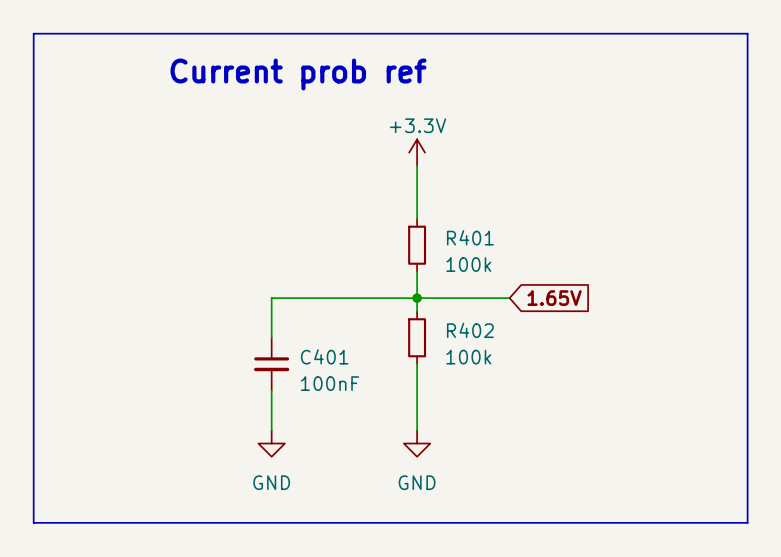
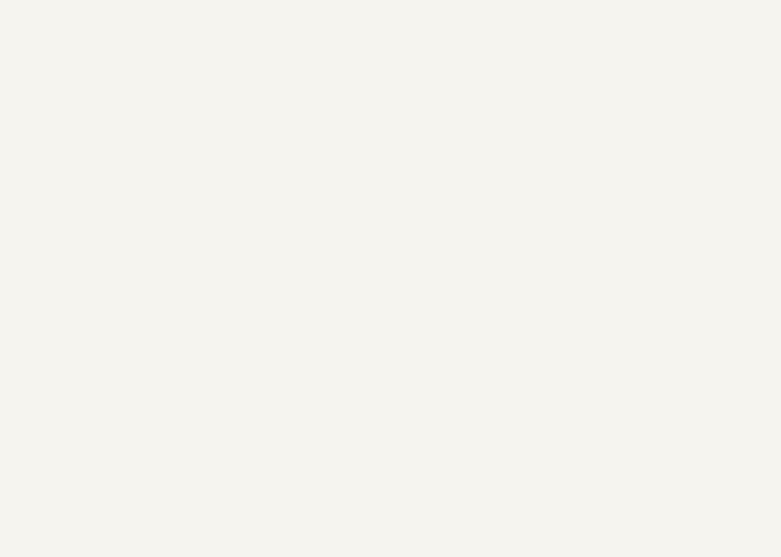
line: (33, 33) (747, 33) (747, 522) (33, 522) (33, 33) -> none
text: Current prob ref (298, 74) -> none
power symbol: +3.3V (417, 152) -> none
wire: (417, 165) (417, 218) -> none
R401: 100k (417, 245) -> none
wire: (417, 271) (417, 311) -> none
junction: (417, 298) -> none
wire: (509, 298) (271, 298) (271, 337) -> none
global label: 1.65V (554, 298) -> none
R402: 100k (417, 337) -> none
C401: 100nF (271, 364) -> none
wire: (417, 364) (417, 430) -> none
wire: (271, 390) (271, 430) -> none
power symbol: GND (271, 443) -> none
power symbol: GND (417, 443) -> none

